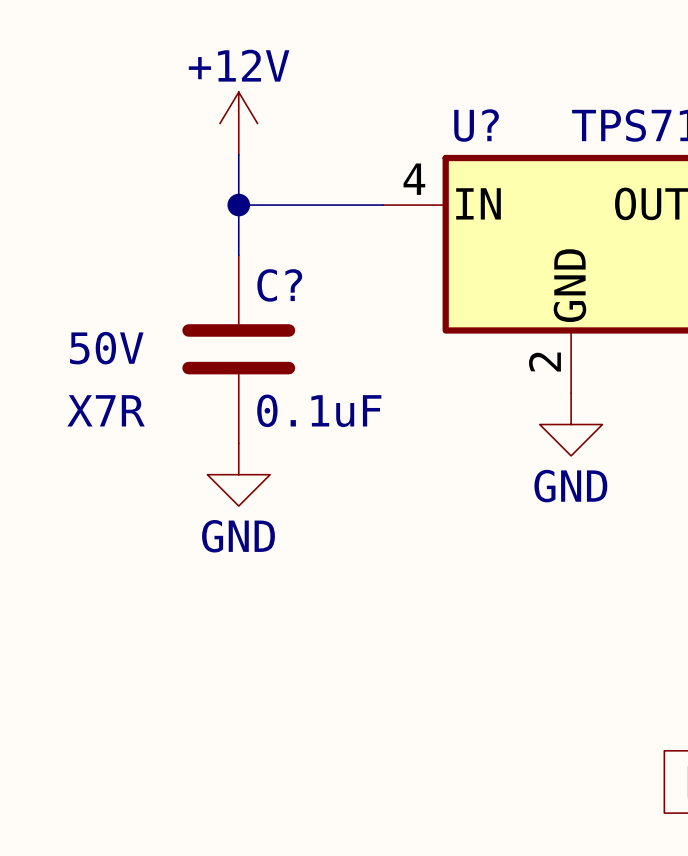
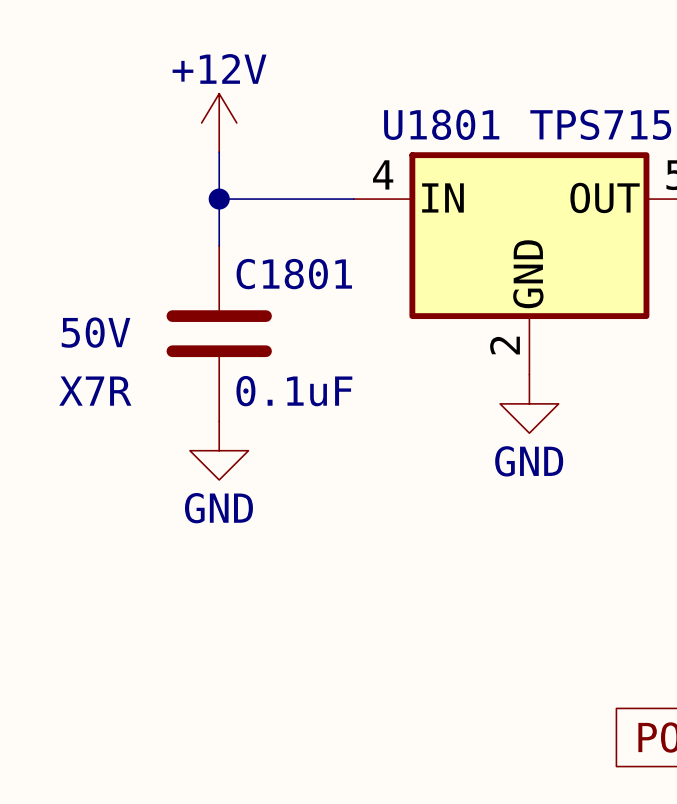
U? name: U? (476, 125) -> U1801 (441, 124)
C? name: C? (279, 285) -> C1801 (294, 274)

